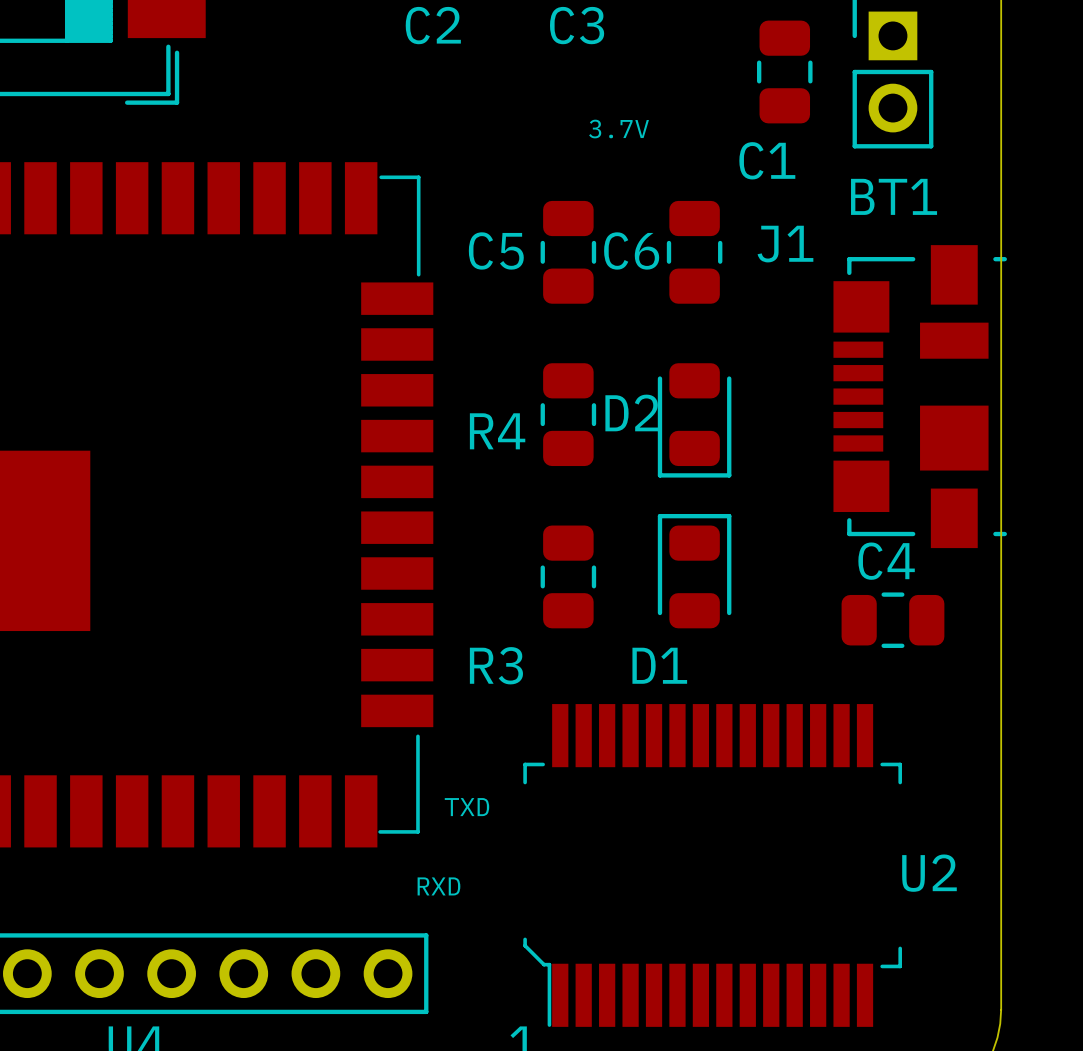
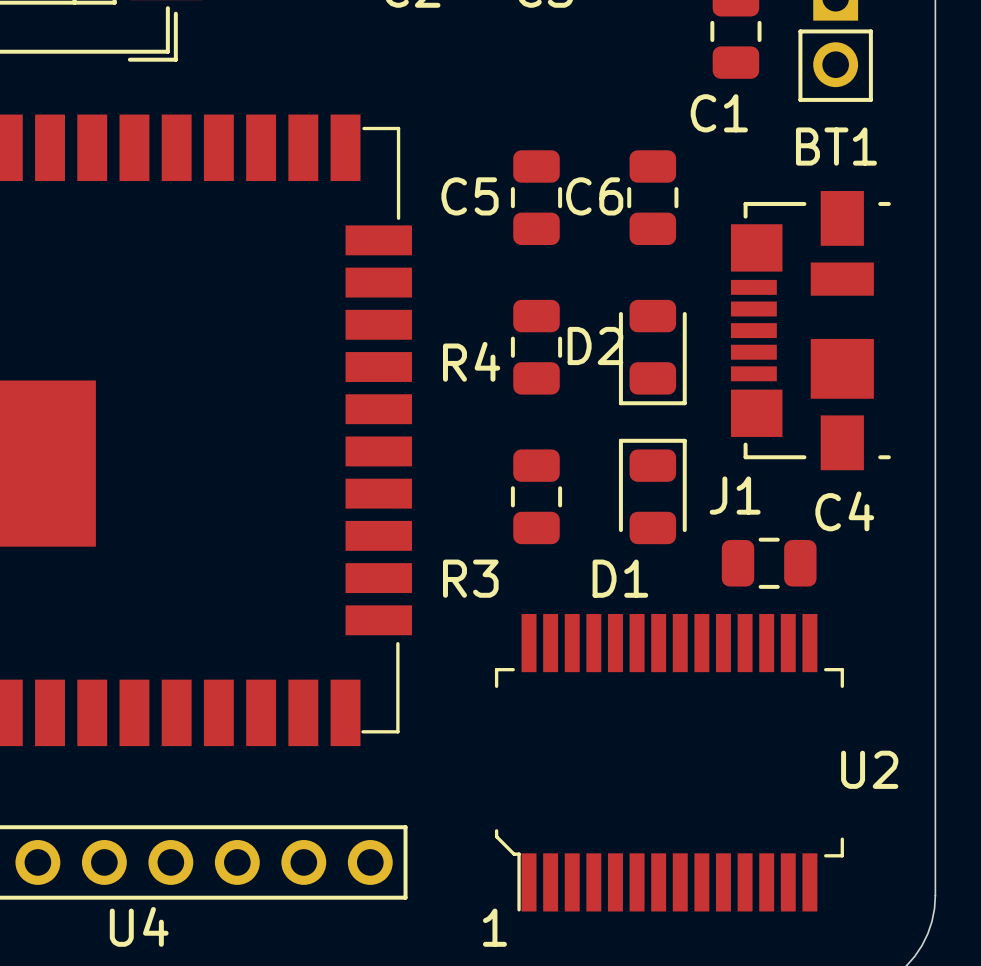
text: 3.7V (619, 129) -> none
J1 name position: J1 (785, 244) -> J1 (735, 495)
J1 position: (920, 396) -> (810, 330)
C4 name position: C4 (886, 561) -> C4 (844, 511)
C4 position: (892, 620) -> (769, 563)
text: TXD (466, 807) -> none
text: RXD (438, 886) -> none

